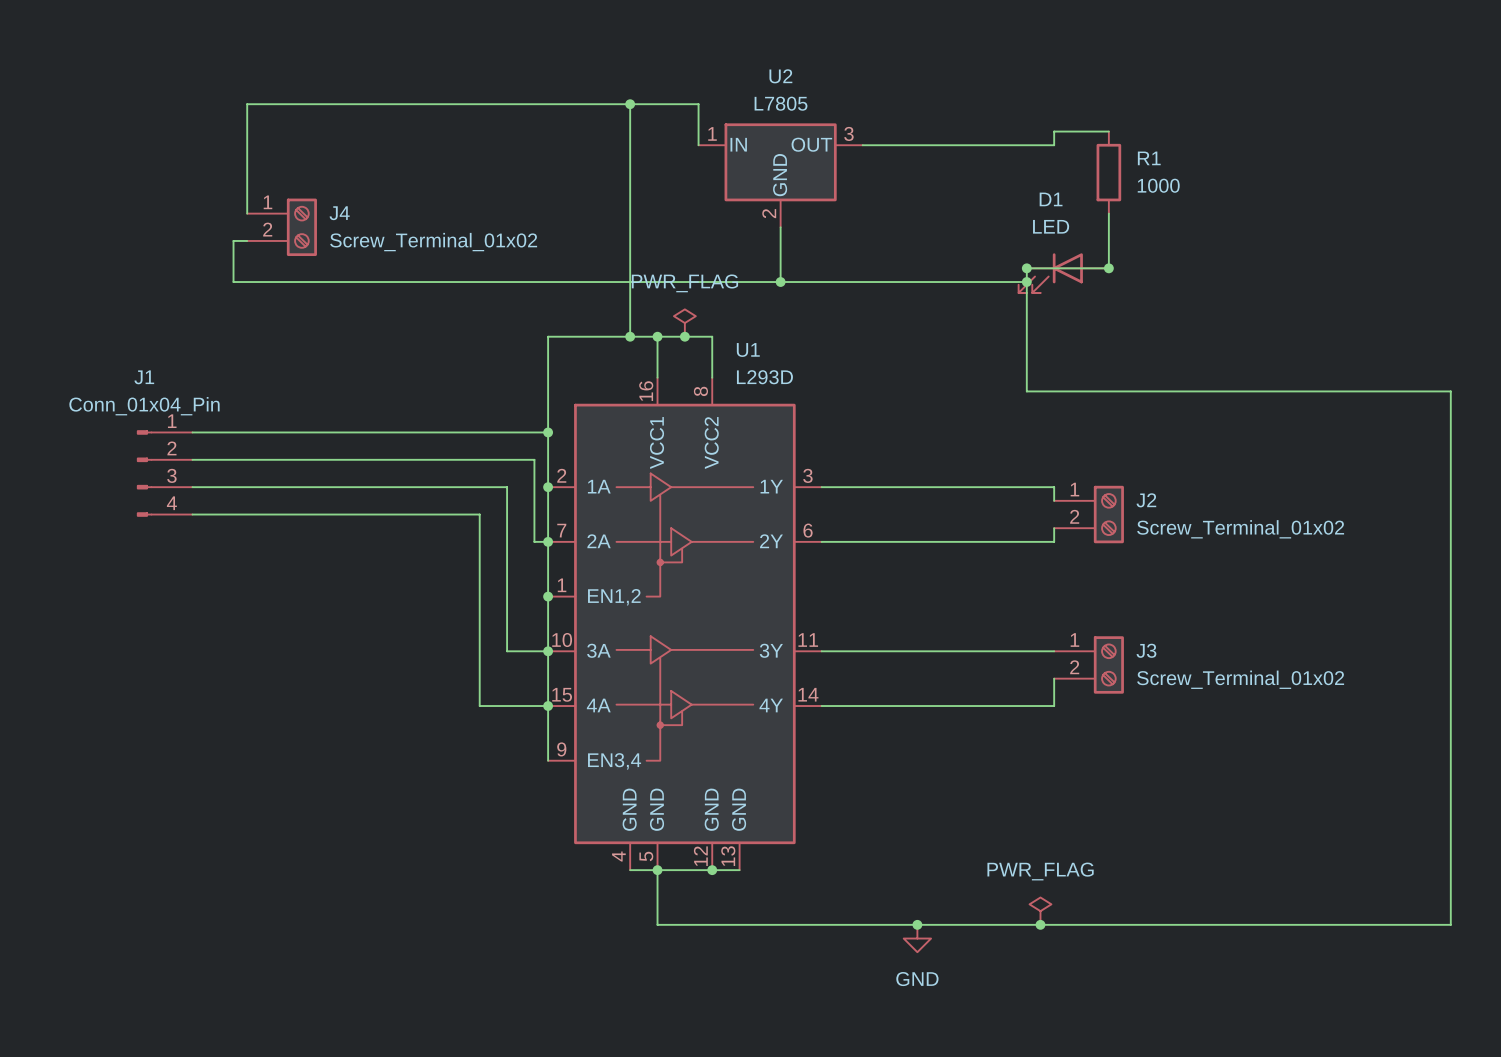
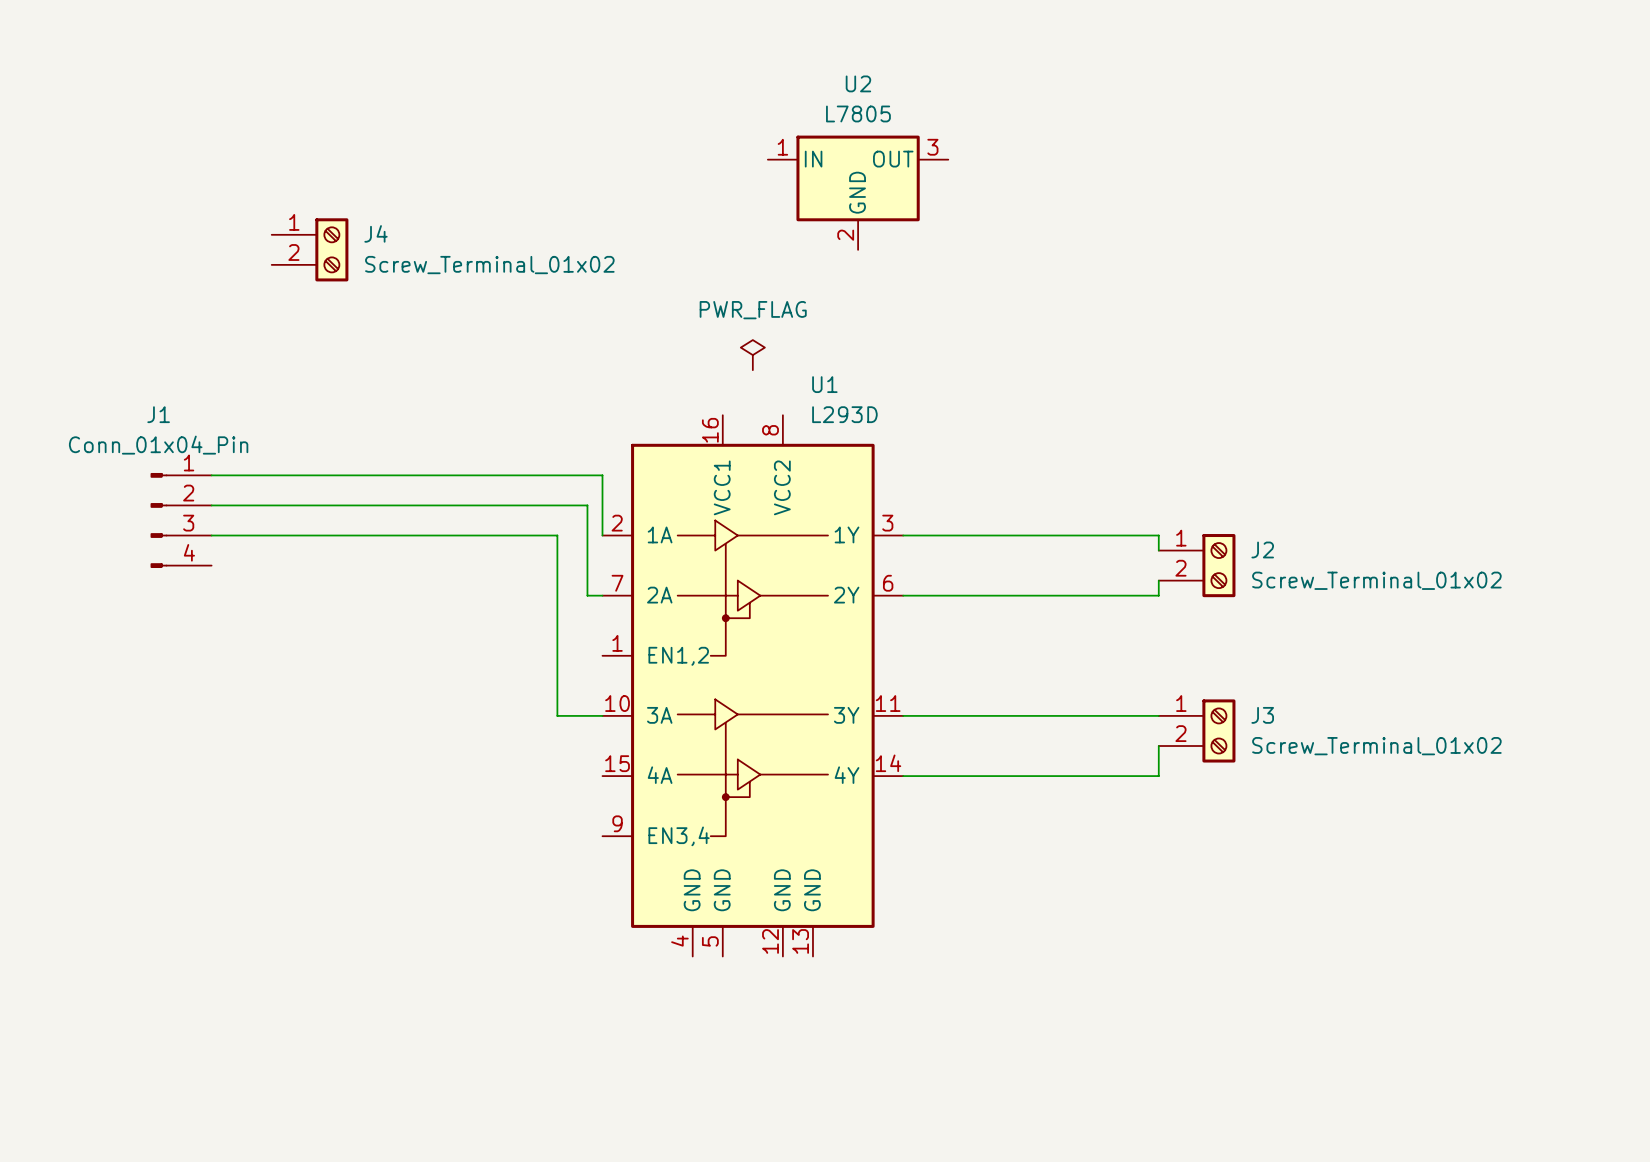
wire: (630, 104) (630, 336) -> none
junction: (630, 104) -> none
wire: (1108, 131) (1054, 131) (1054, 145) (862, 145) -> none
wire: (698, 145) (698, 104) (247, 104) (247, 213) -> none
R1: 1000 (1108, 172) -> none
wire: (1108, 213) (1108, 268) (1026, 268) (1026, 391) (1450, 391) (1450, 924) (657, 924) (657, 870) -> none
wire: (780, 227) (780, 282) -> none
wire: (247, 240) (233, 240) (233, 282) (1026, 282) -> none
junction: (1026, 268) -> none
junction: (1108, 268) -> none
D1: LED (1063, 273) -> none
junction: (780, 282) -> none
junction: (1026, 282) -> none
junction: (630, 336) -> none
wire: (657, 336) (657, 377) -> none
junction: (657, 336) -> none
junction: (684, 336) -> none
wire: (712, 377) (712, 336) (548, 336) (548, 432) -> none
junction: (548, 432) -> none
wire: (548, 487) (548, 760) -> none
junction: (548, 487) -> none
wire: (192, 514) (479, 514) (479, 706) (548, 706) -> none
junction: (548, 541) -> none
junction: (548, 596) -> none
junction: (548, 651) -> none
junction: (548, 706) -> none
wire: (630, 870) (739, 870) -> none
junction: (657, 870) -> none
junction: (712, 870) -> none
power symbol: PWR_FLAG (1040, 911) -> none
junction: (917, 924) -> none
junction: (1040, 924) -> none
power symbol: GND (917, 938) -> none

